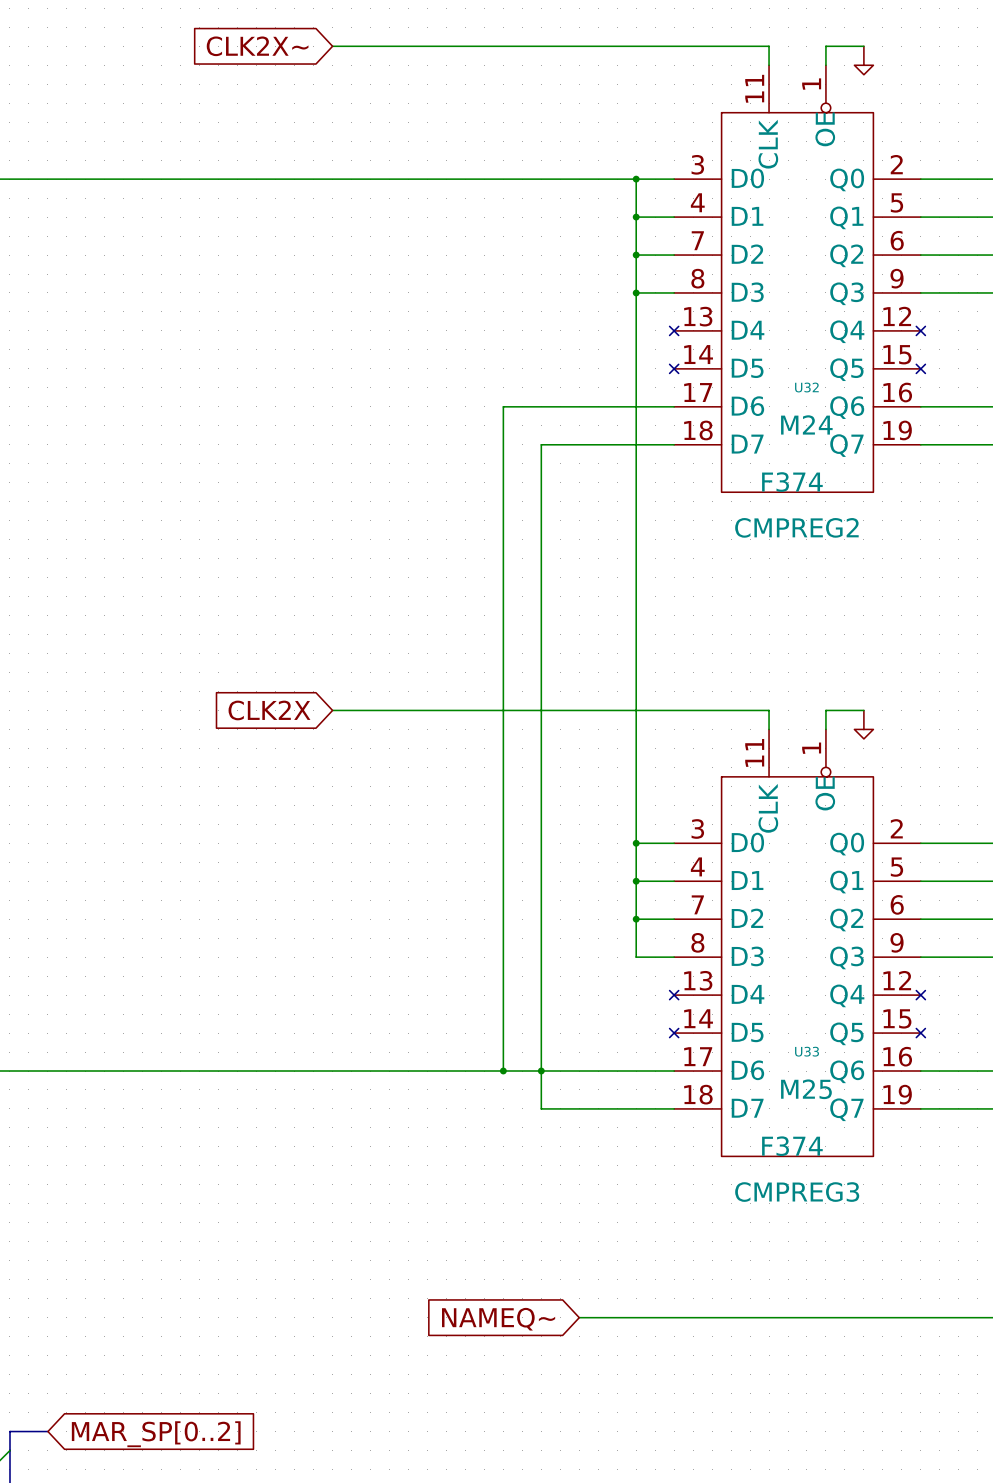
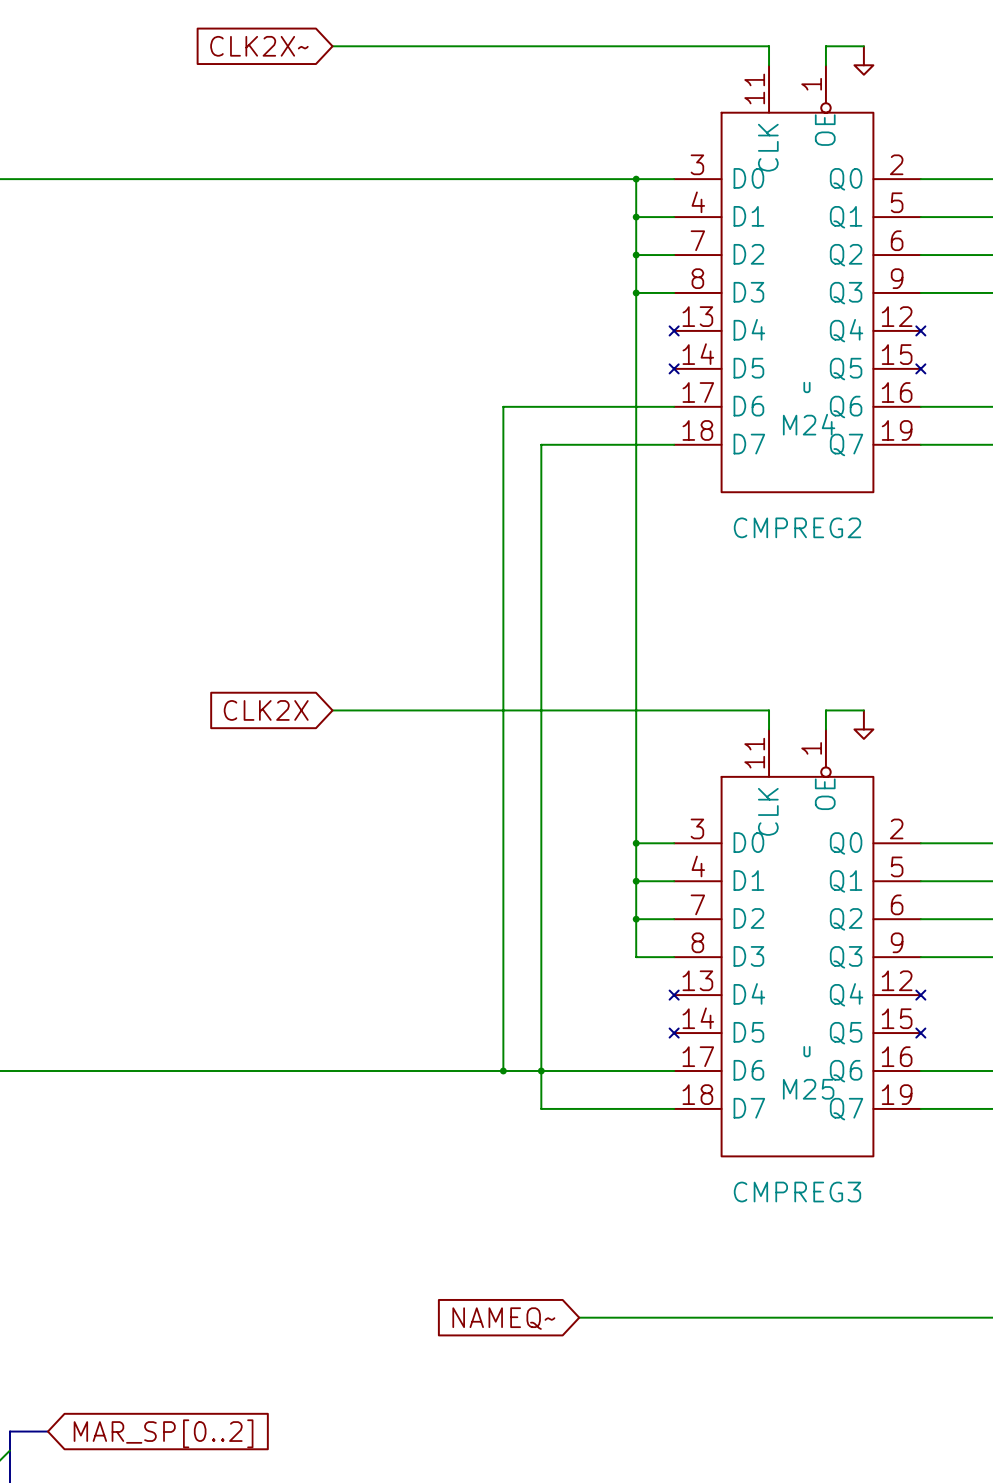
U32 name: U32 (806, 387) -> U (806, 387)
U32 value: F374 (792, 482) -> none
U33 name: U33 (807, 1051) -> U (806, 1051)
U33 value: F374 (792, 1146) -> none

